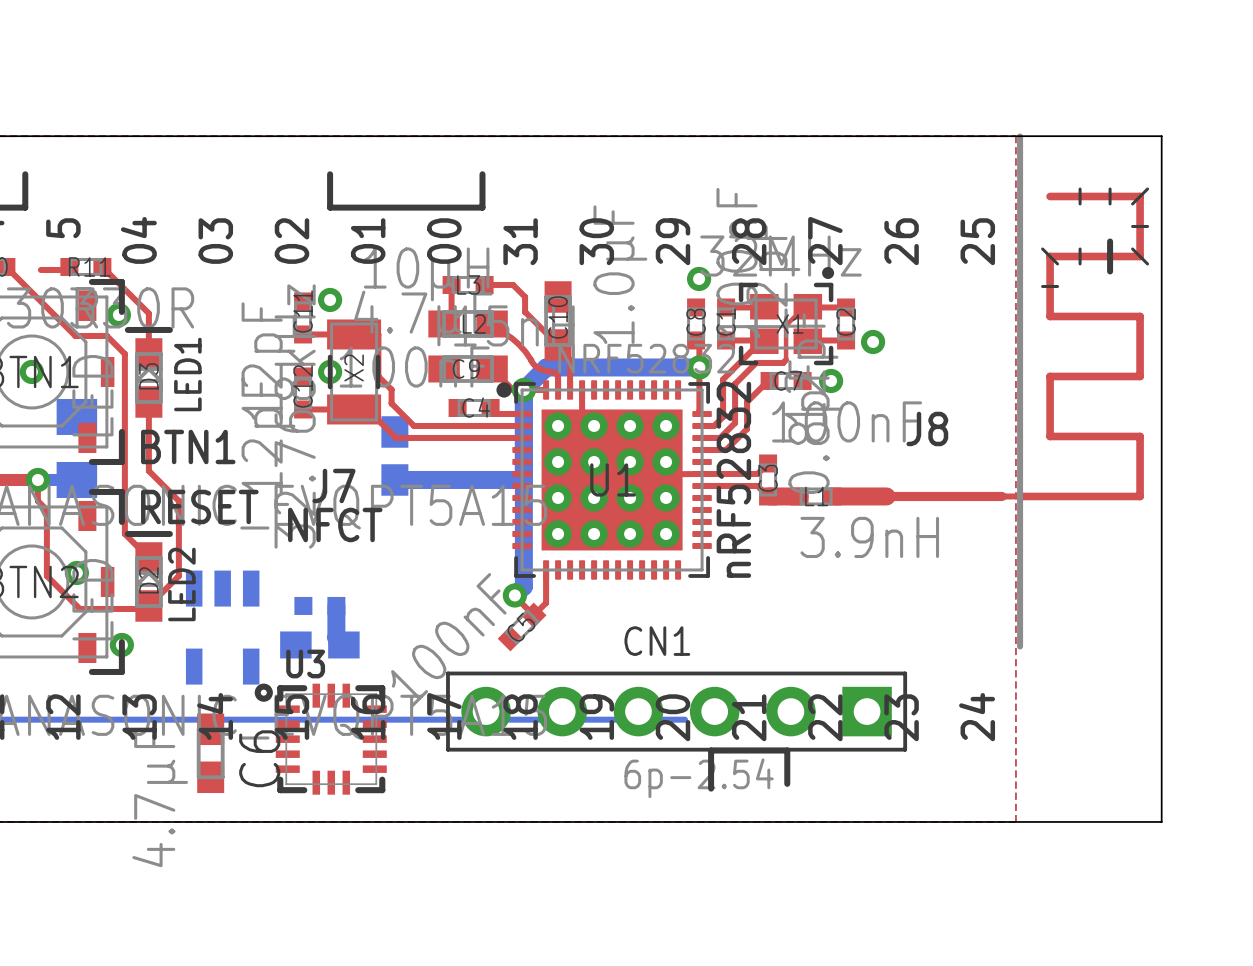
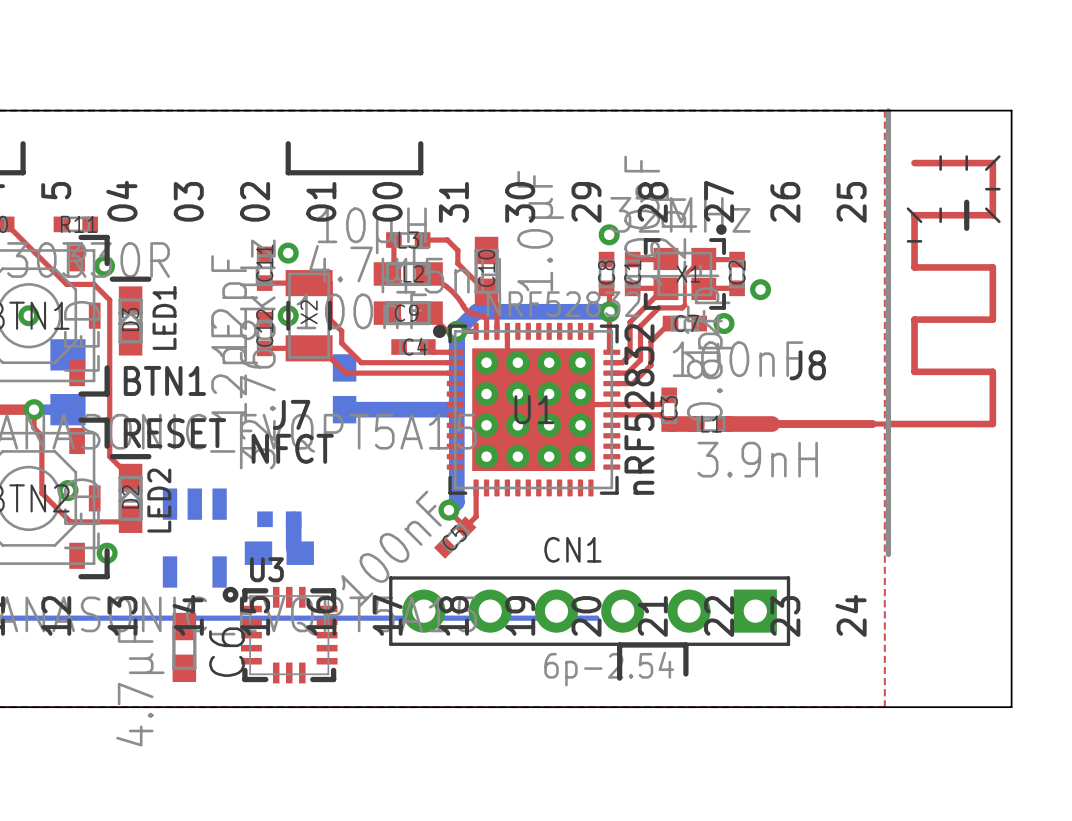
top track: (69, 266) (66, 269) (40, 269) -> none
top track: (102, 266) (148, 313) (148, 353) -> none
top track: (148, 401) (148, 470) (178, 500) (178, 575) (148, 605) -> none

